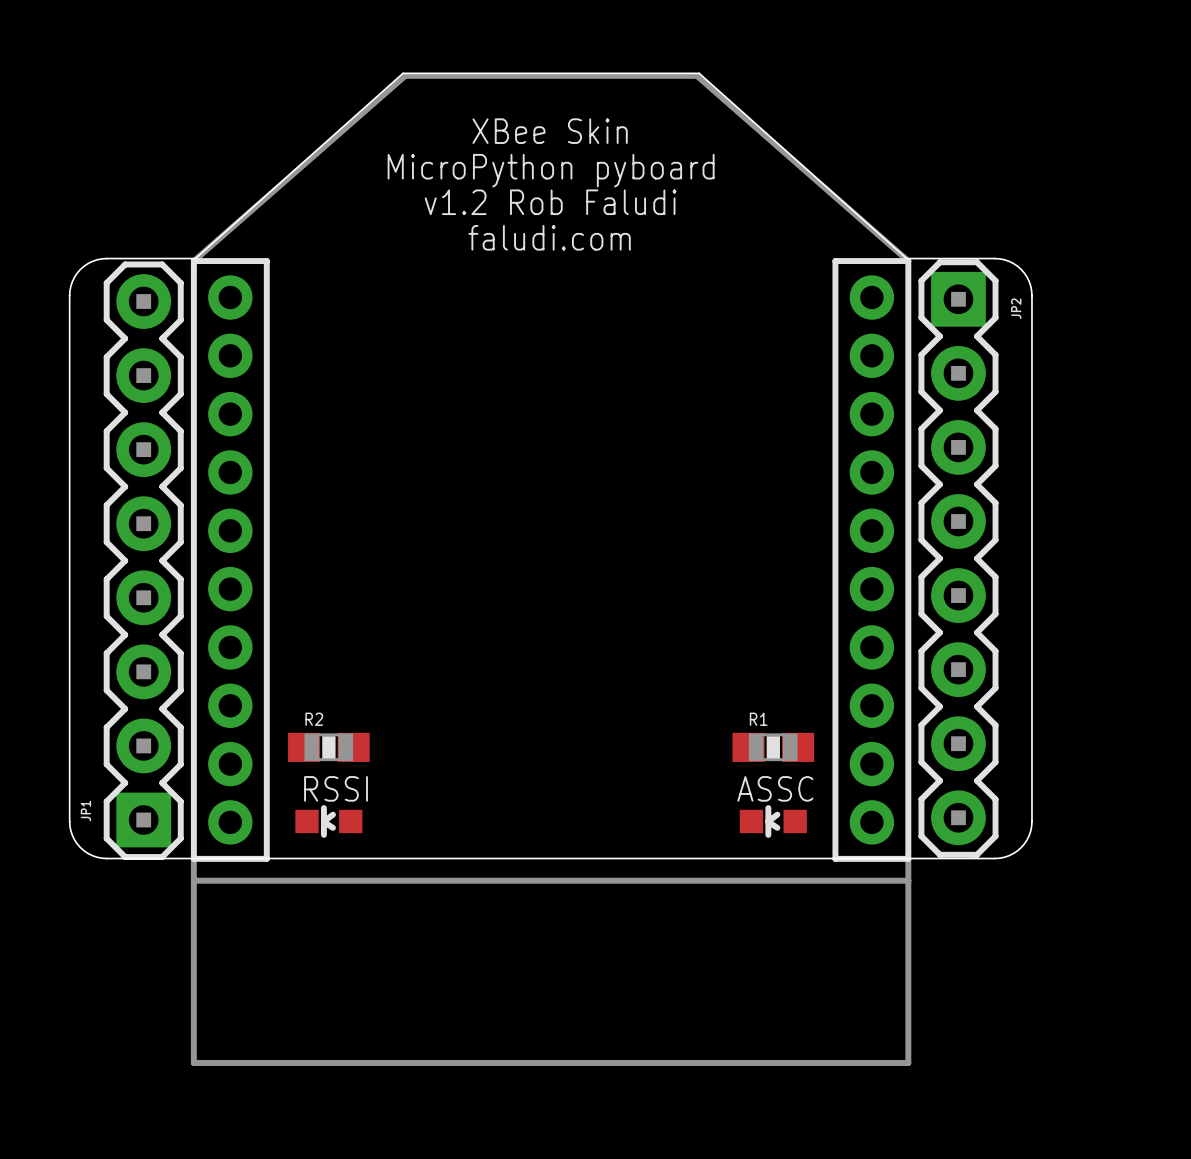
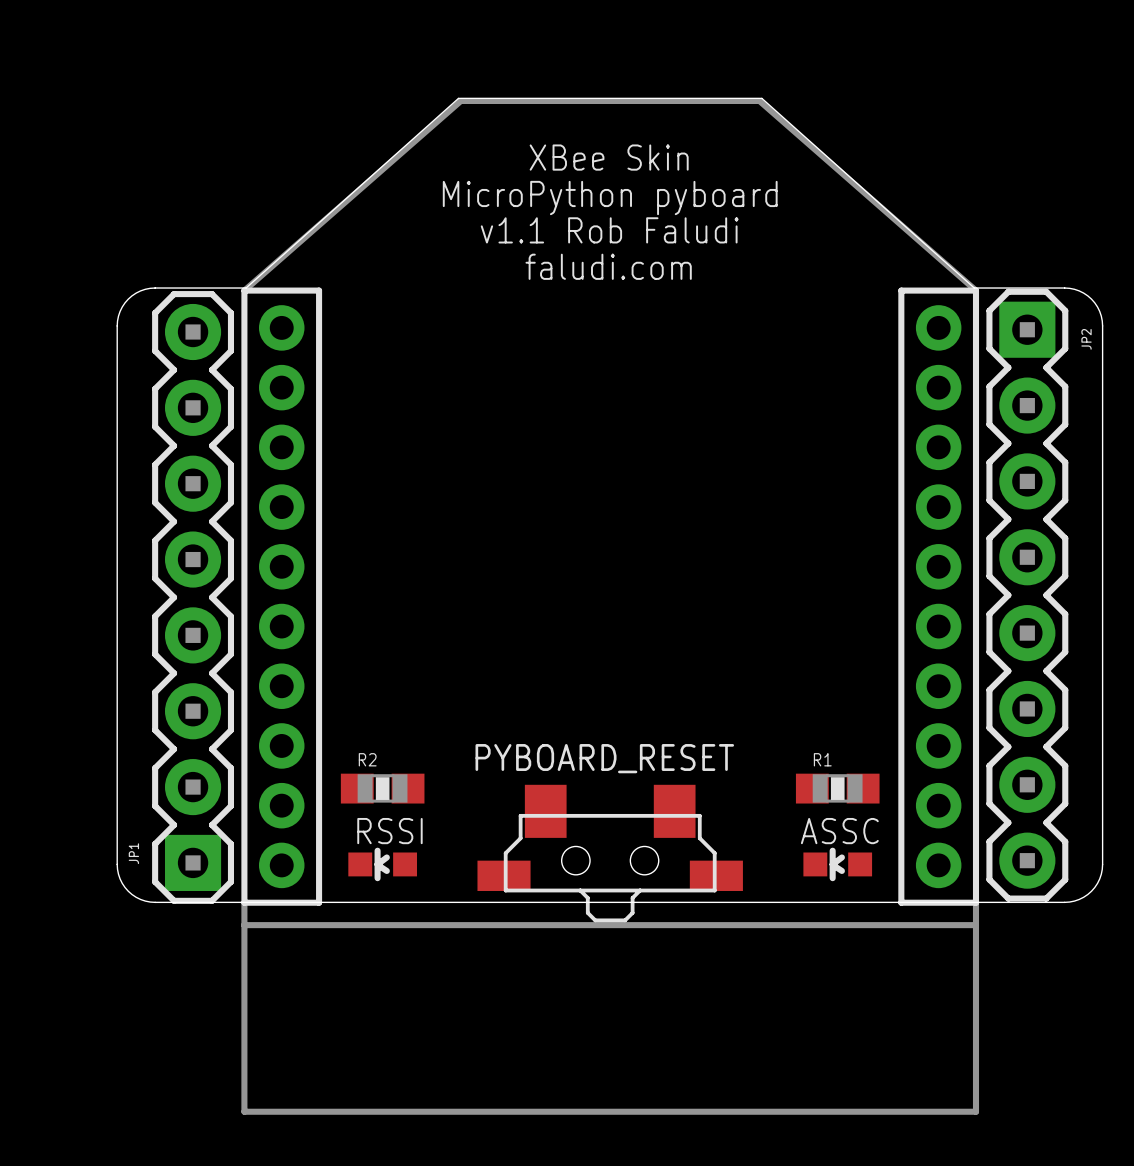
text: v1.2 Rob Faludi (550, 202) -> v1.1 Rob Faludi (609, 230)
PYBOARD_RESET: none -> (610, 853)

